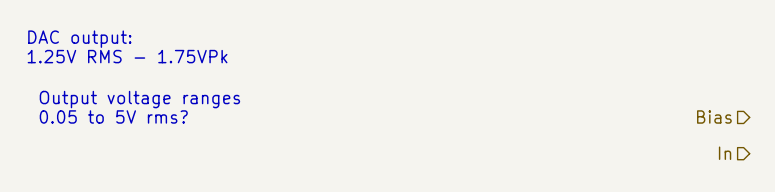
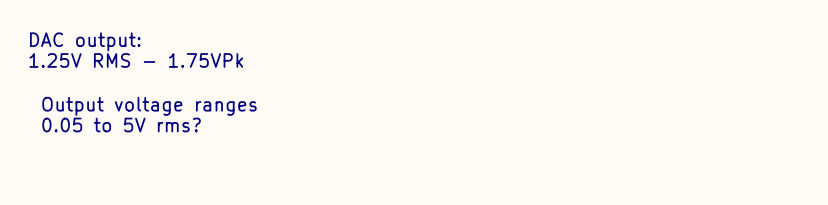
hierarchical label: Bias (714, 116) -> none
hierarchical label: In (725, 153) -> none

